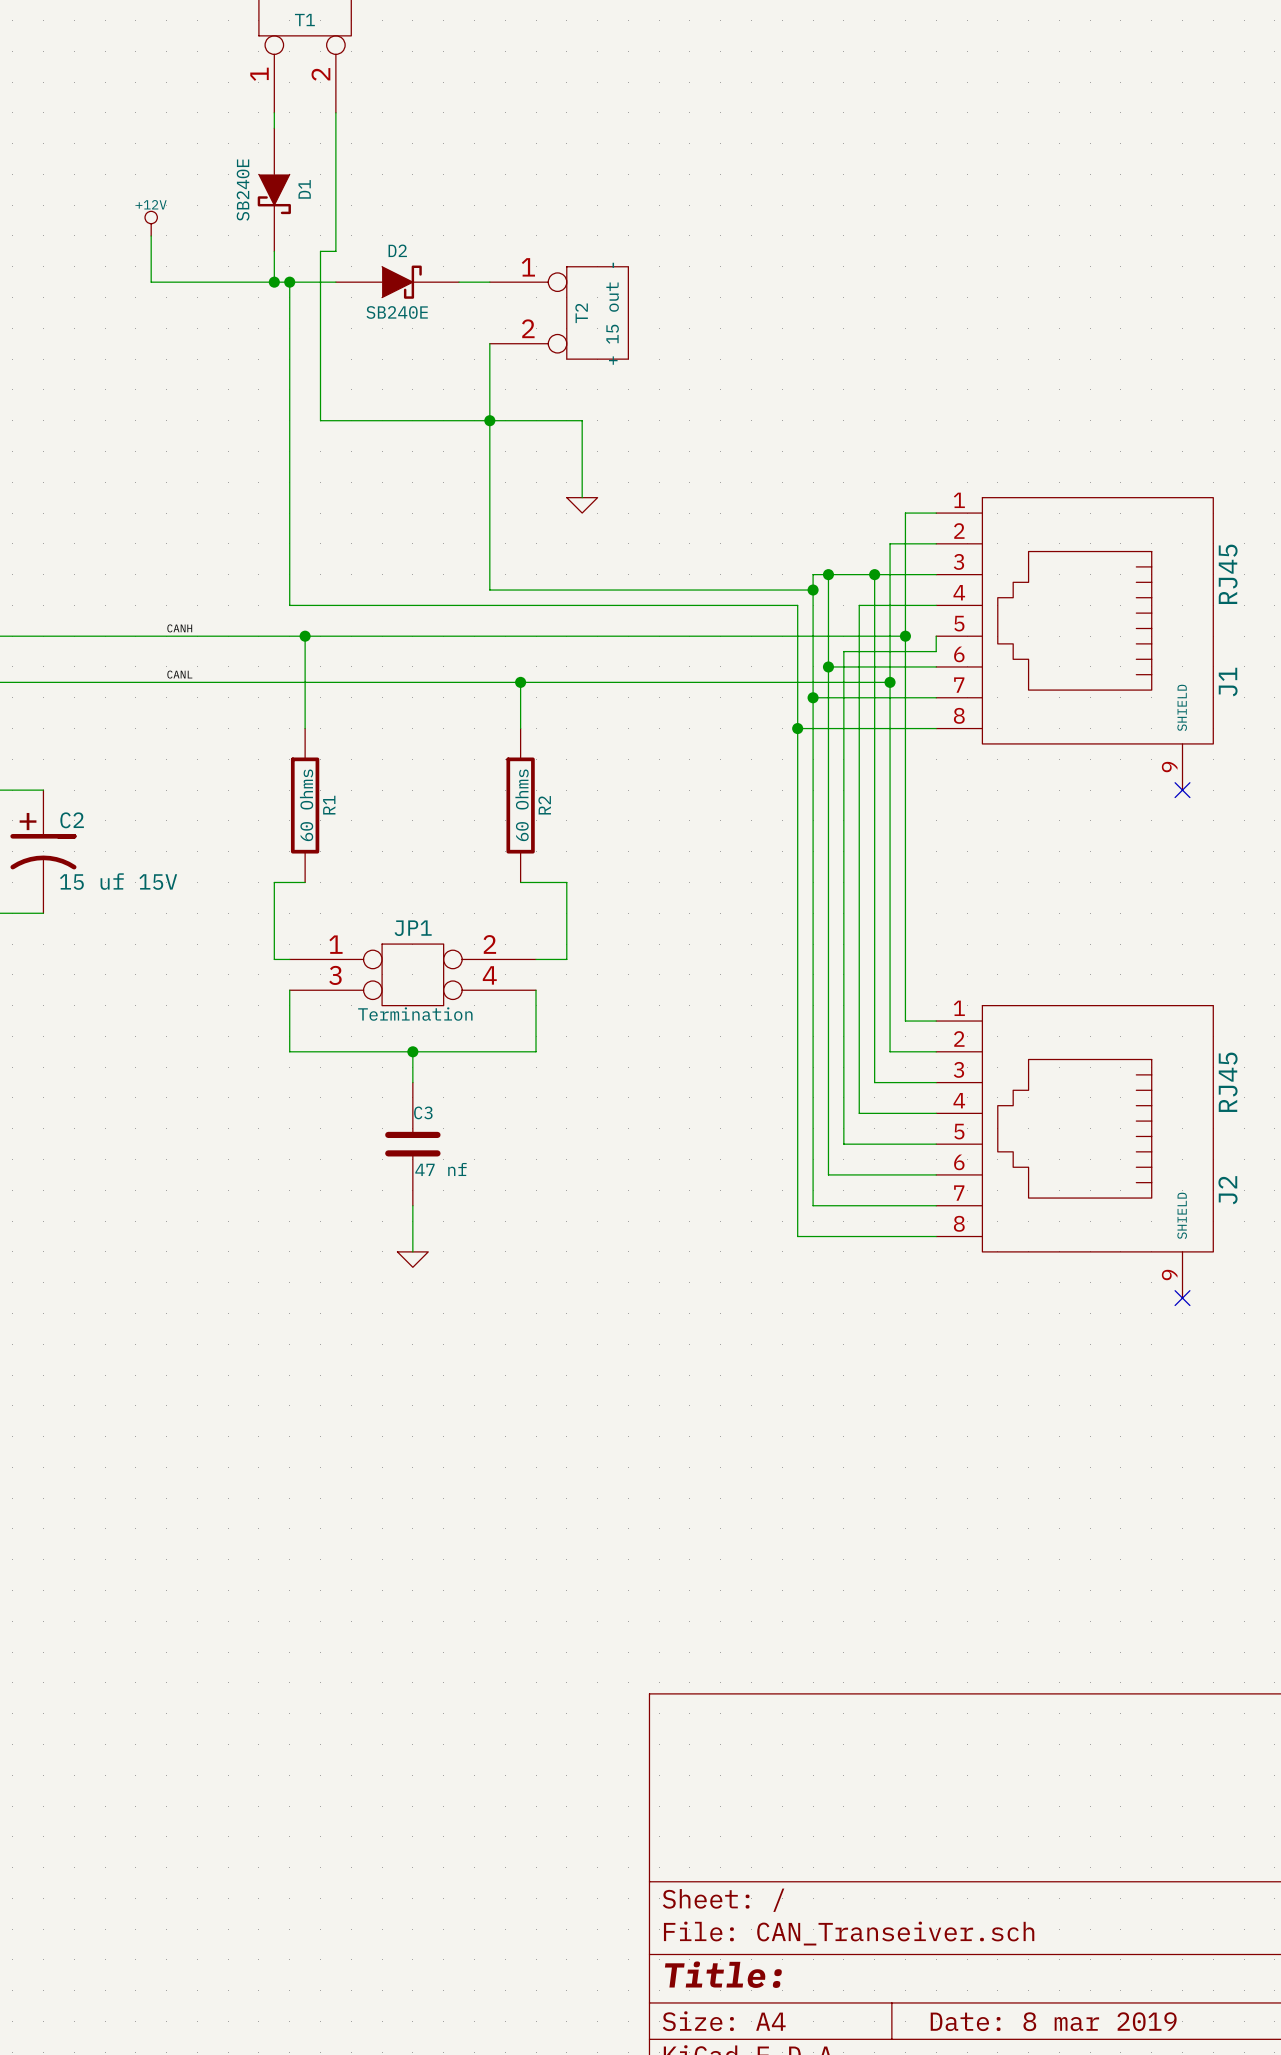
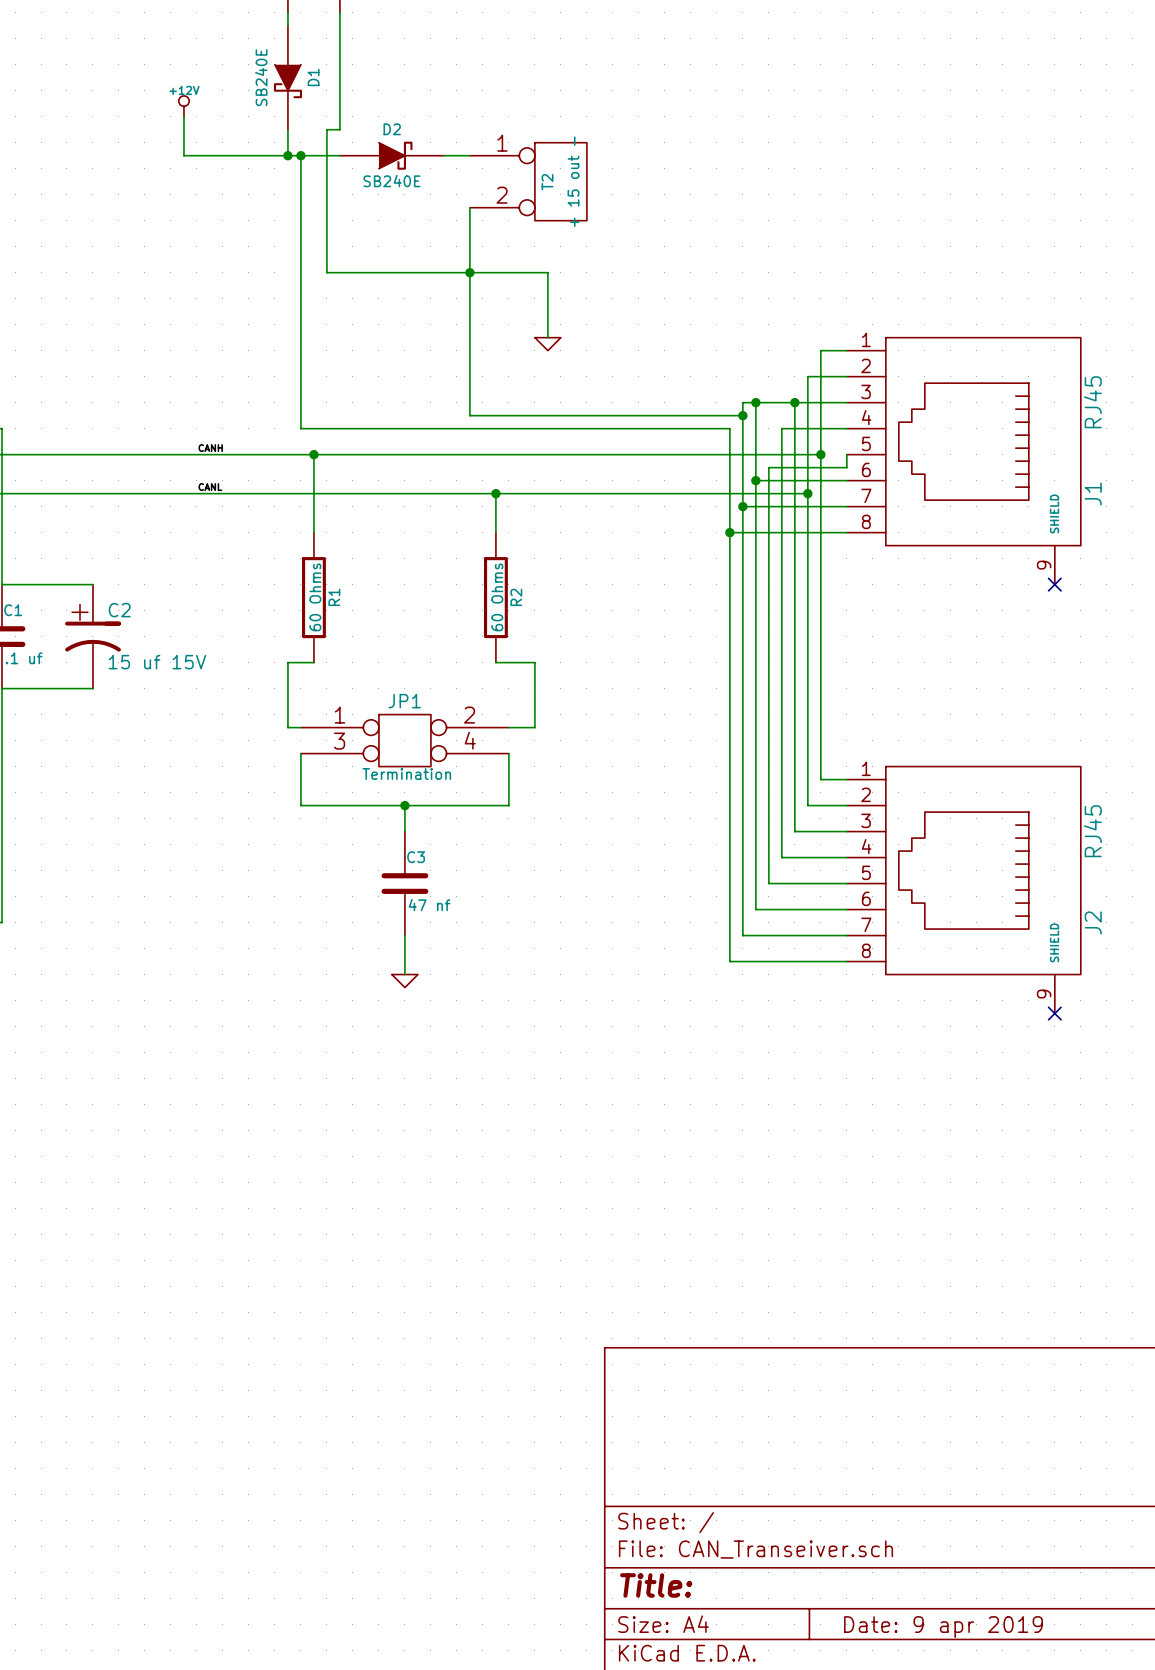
title block: Date: 8 mar 2019 (1053, 2021) -> Date: 9 apr 2019 (943, 1627)

